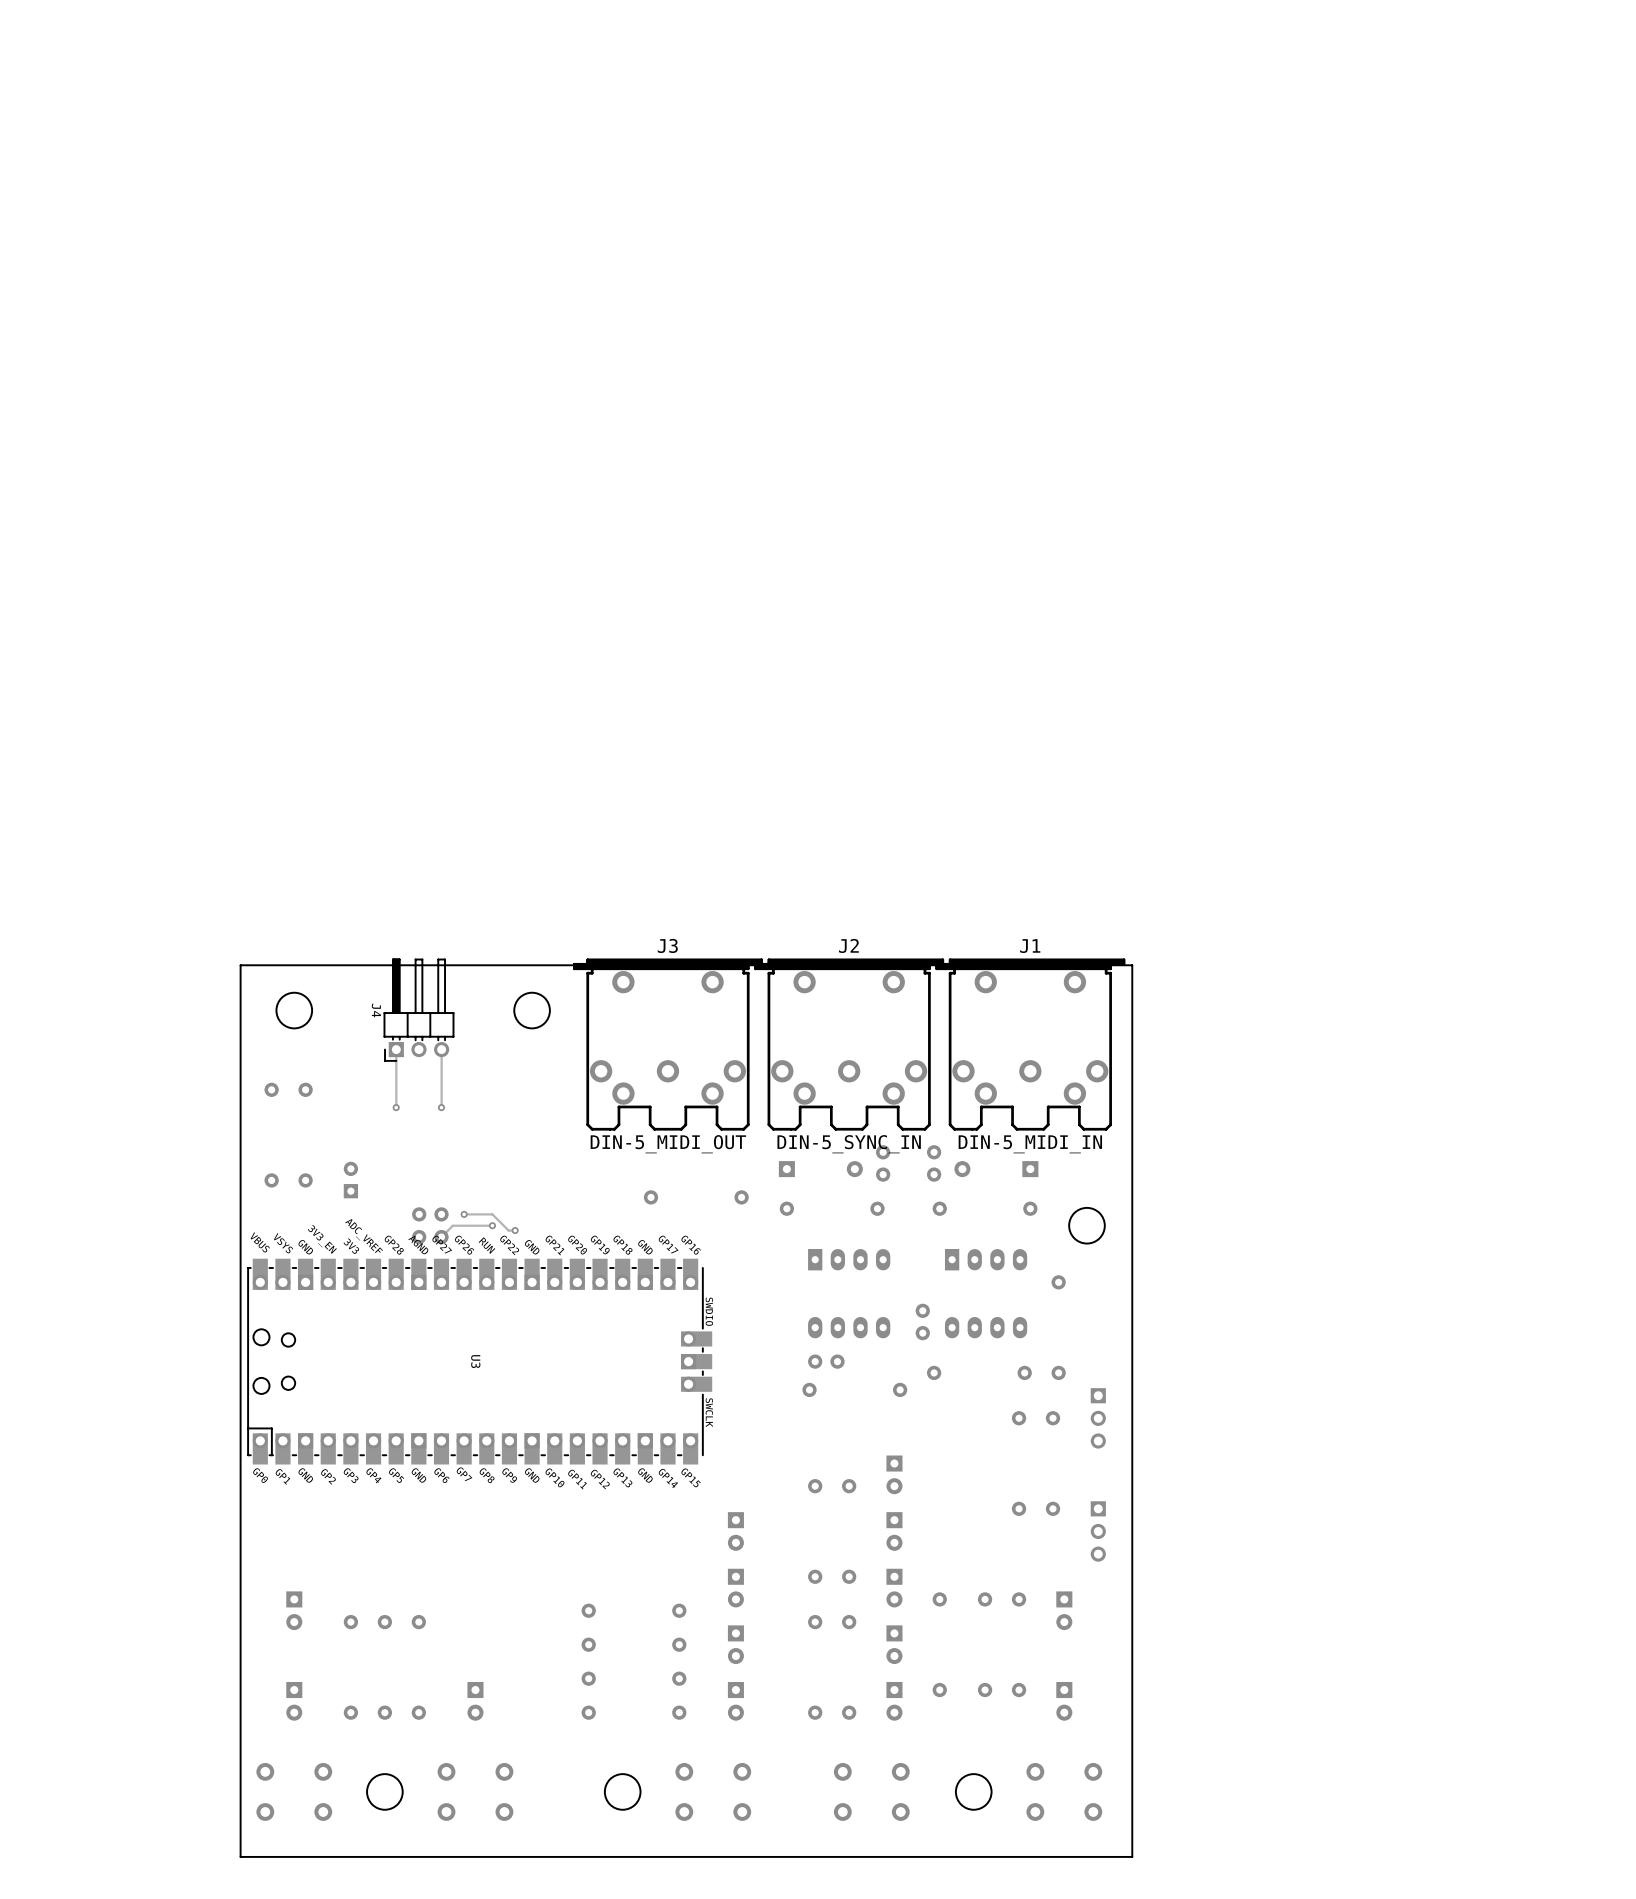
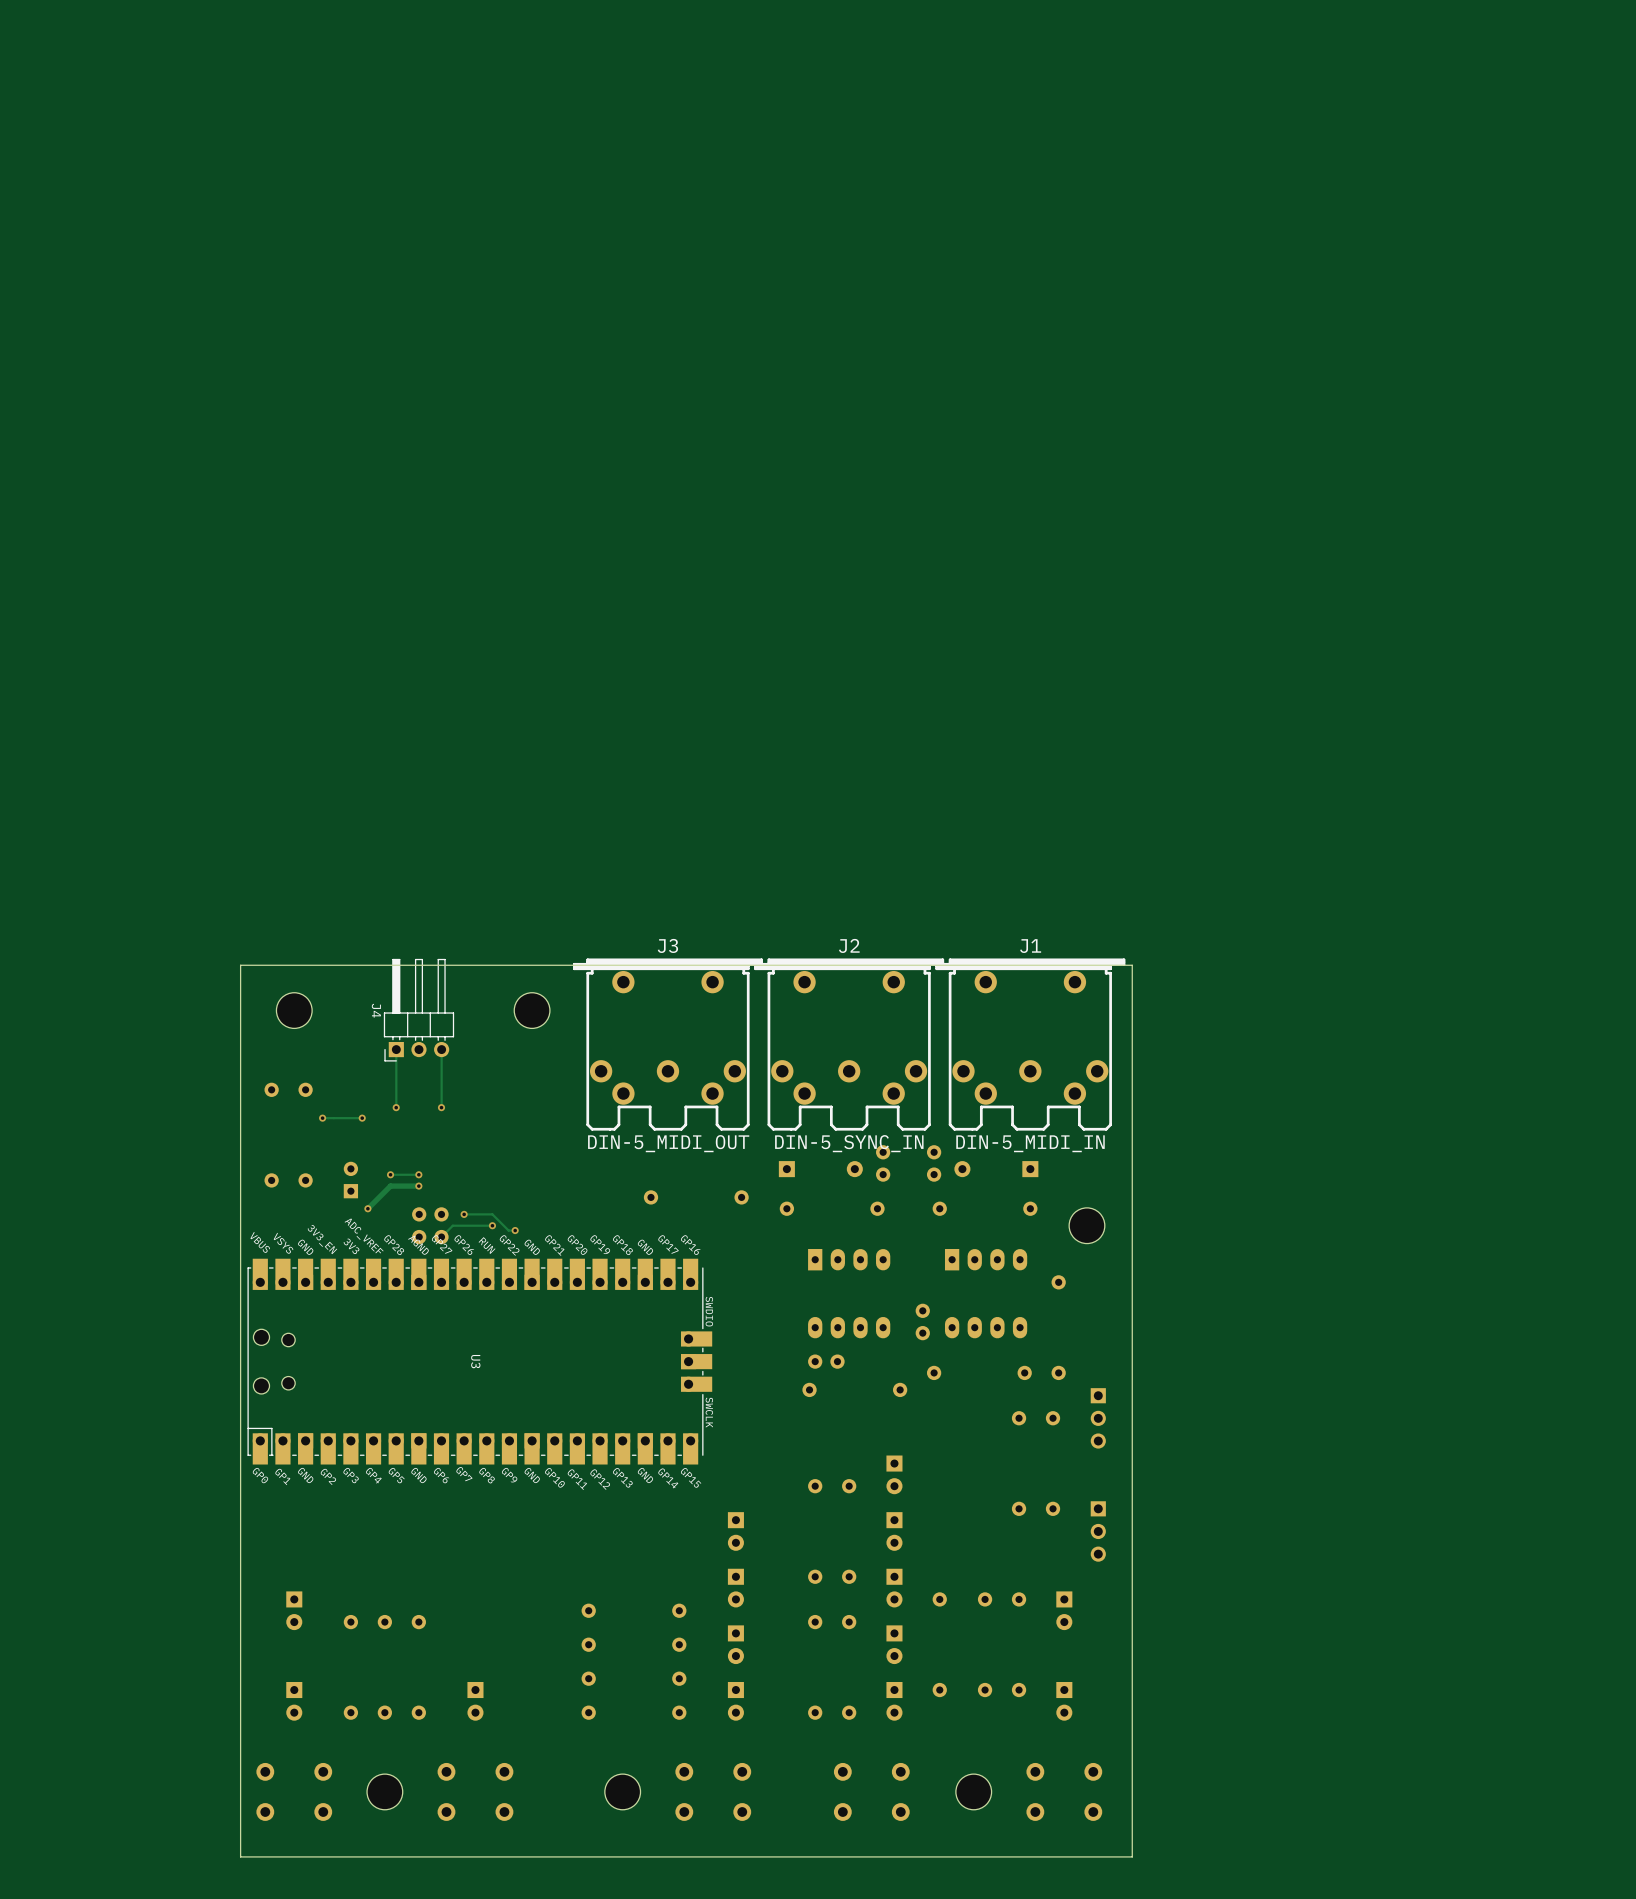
via: none -> (322, 1118)
track: none -> (362, 1118) (322, 1118)
via: none -> (362, 1118)
via: none -> (390, 1174)
track: none -> (418, 1174) (390, 1174)
via: none -> (418, 1174)
track: none -> (418, 1186) (390, 1186) (367, 1208)
via: none -> (418, 1186)
via: none -> (367, 1208)

